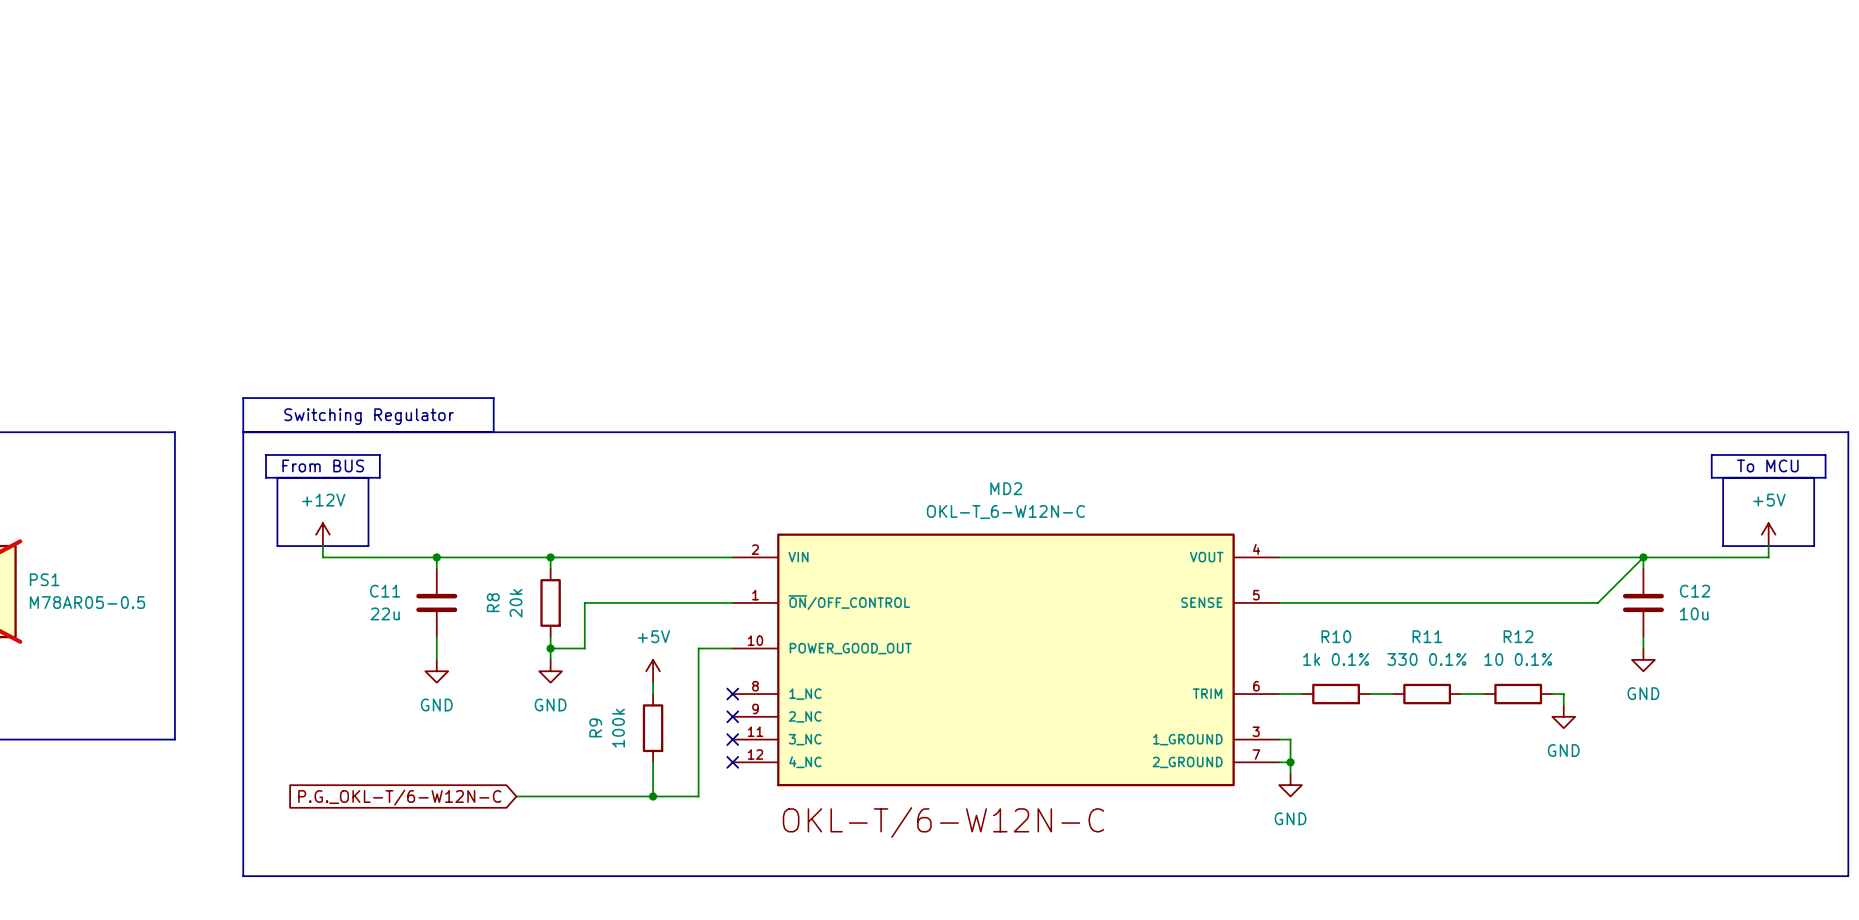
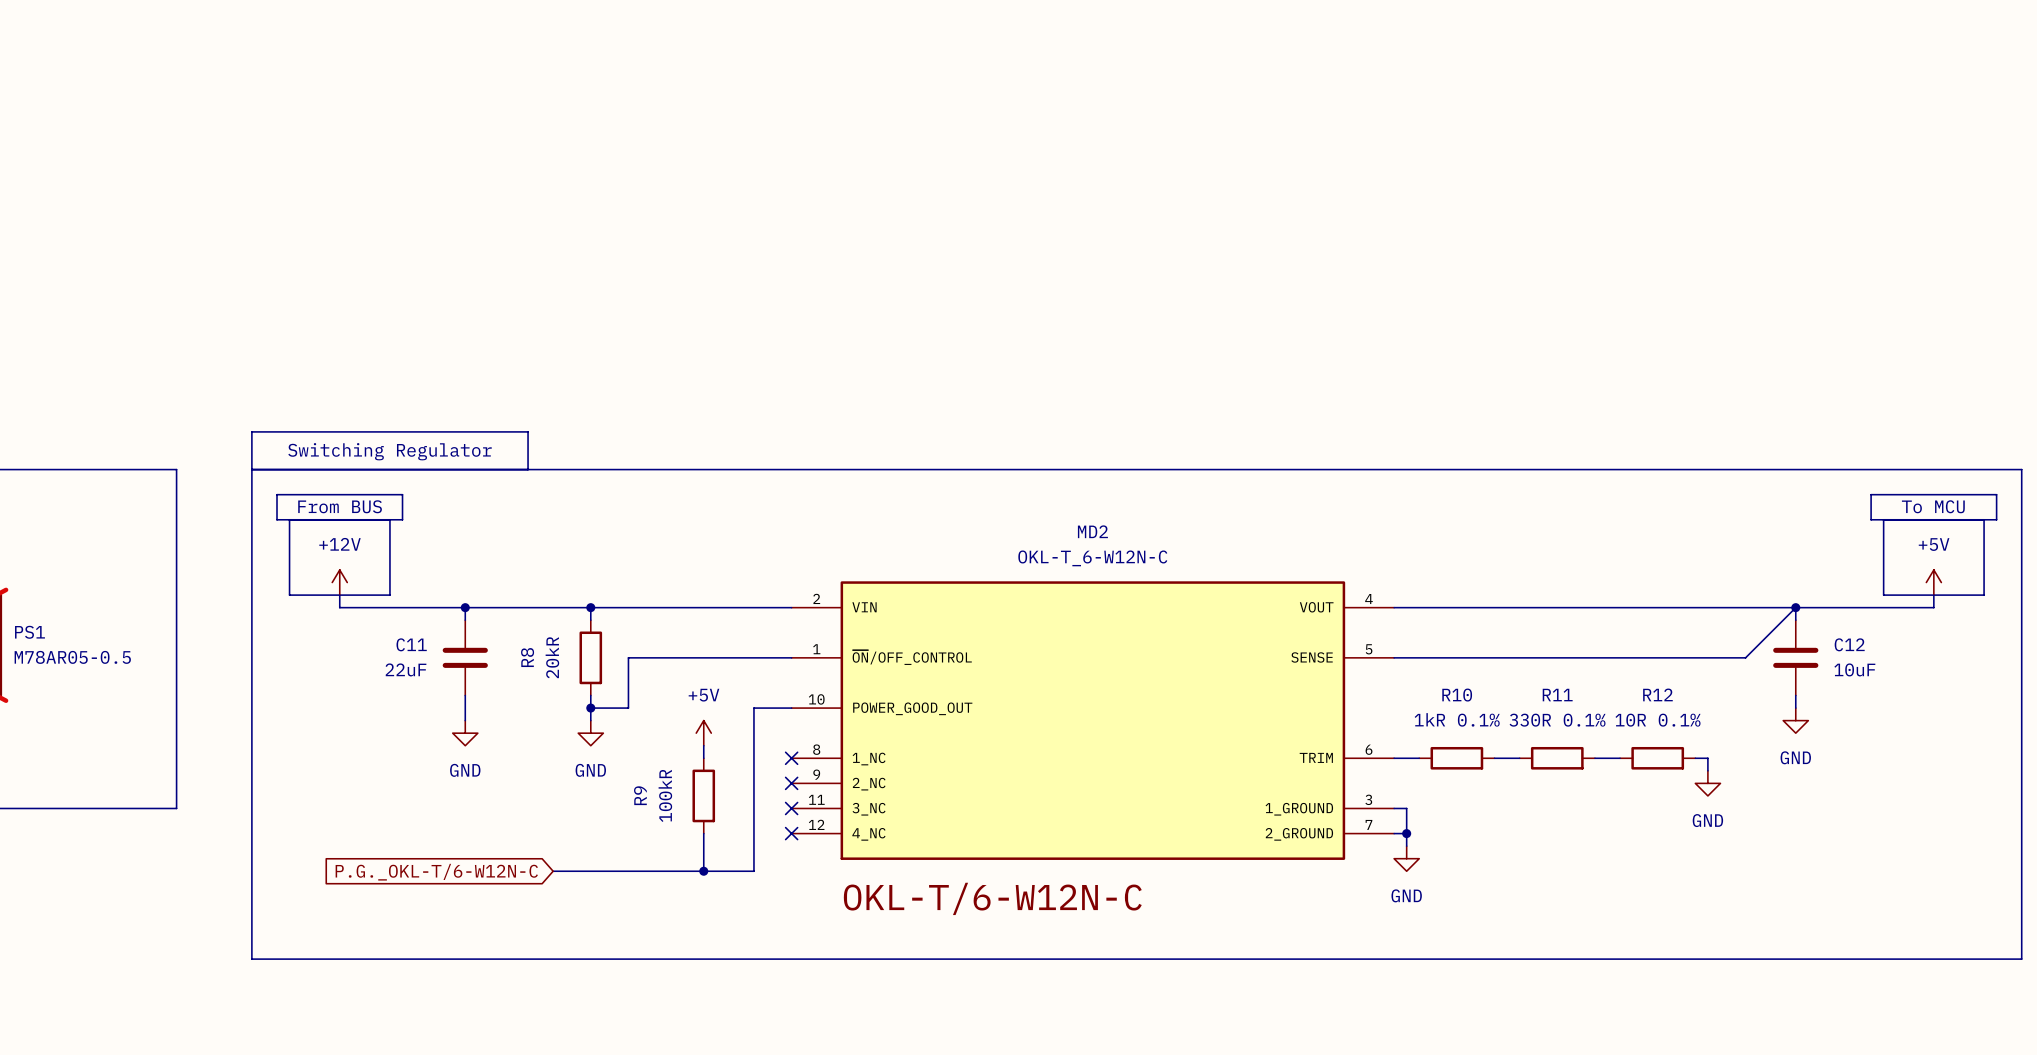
R8 value: 20k (516, 603) -> 20kR (552, 657)
C11 value: 22u (385, 613) -> 22uF (405, 669)
C12 value: 10u (1694, 613) -> 10uF (1854, 669)
R10 value: 1k 0.1% (1336, 659) -> 1kR 0.1% (1457, 719)
R11 value: 330 0.1% (1426, 659) -> 330R 0.1% (1557, 720)
R12 value: 10 0.1% (1518, 659) -> 10R 0.1% (1658, 720)
R9 value: 100k (618, 728) -> 100kR (665, 795)

